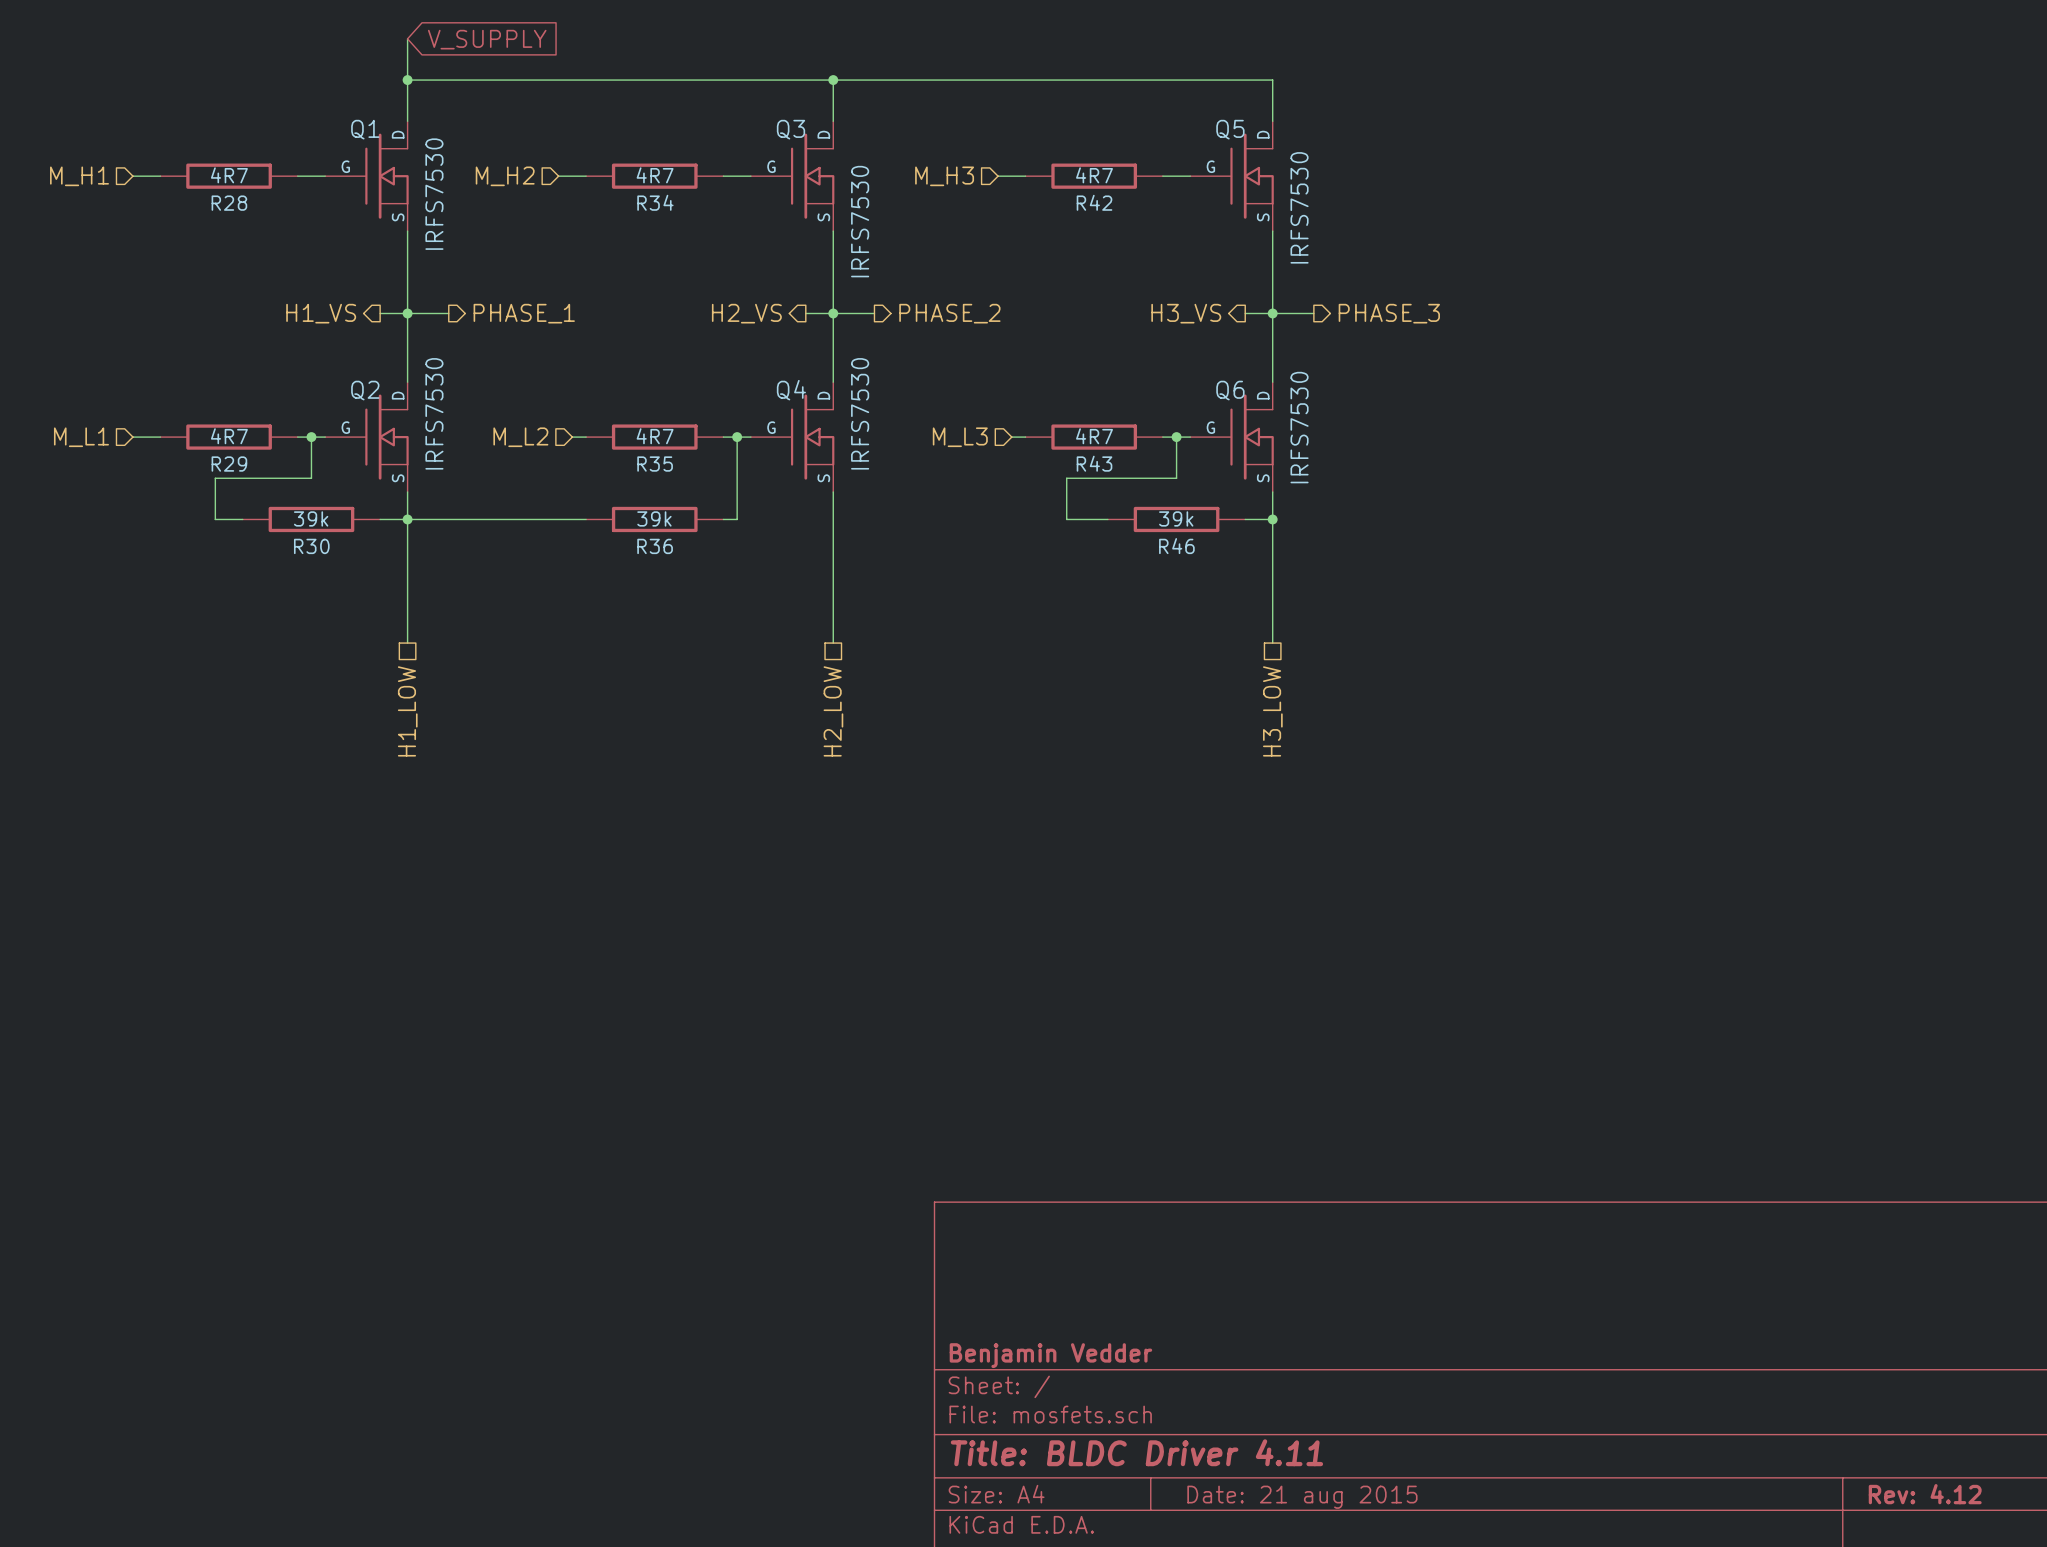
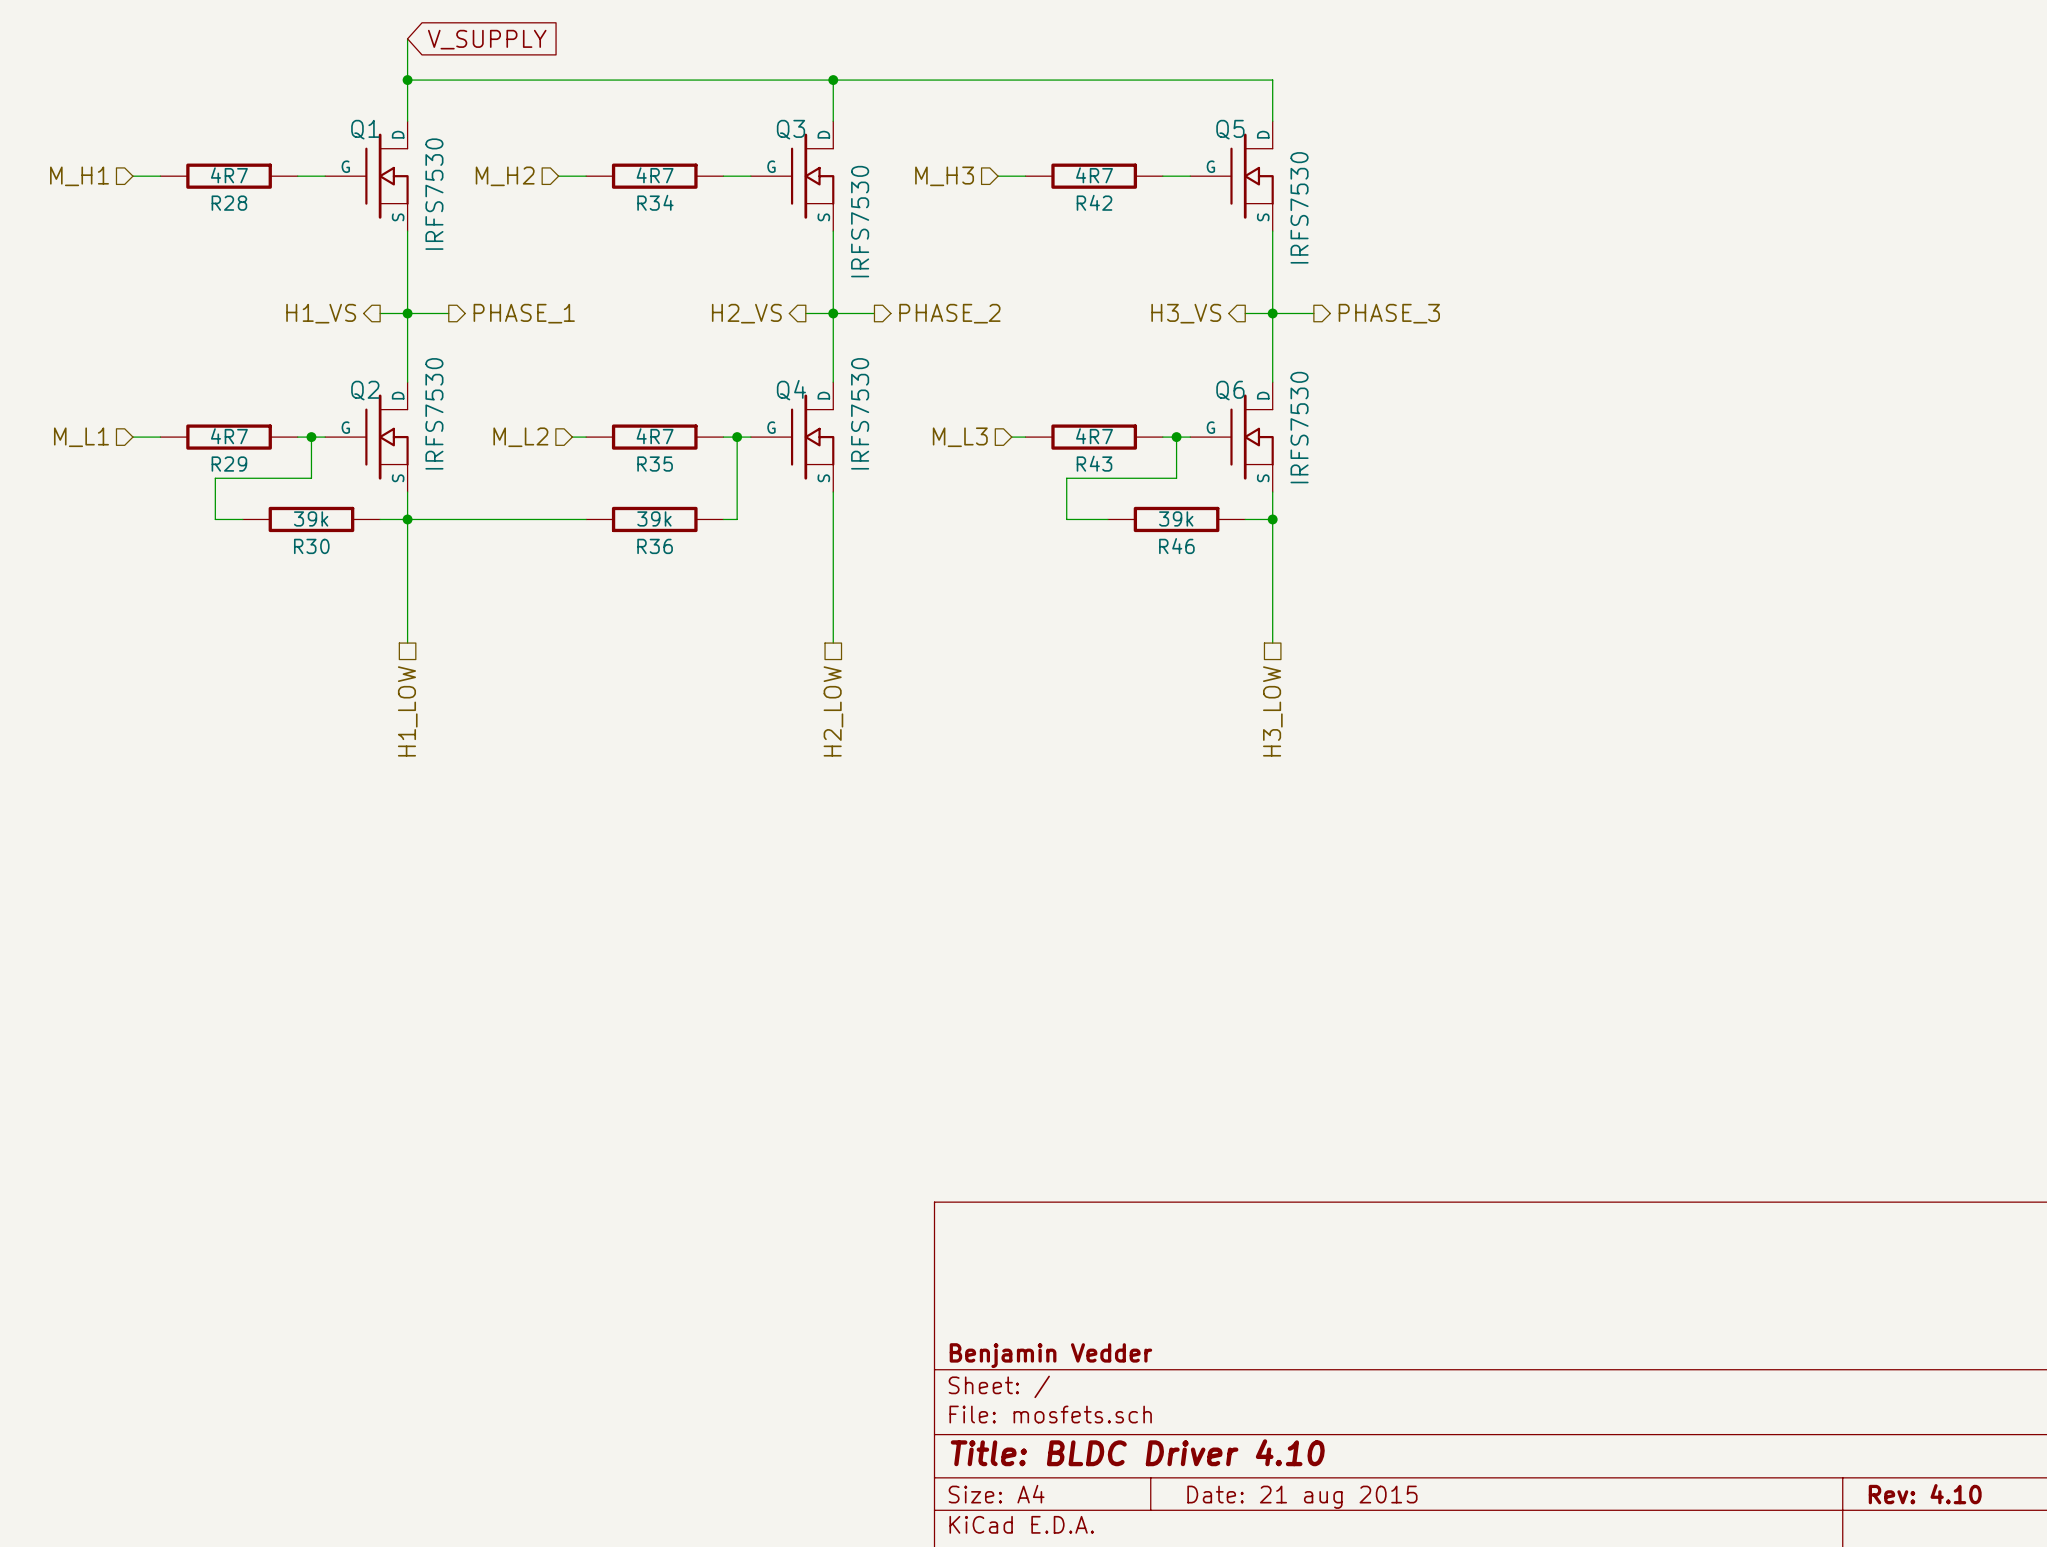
title block: Title: BLDC Driver 4.11 (1136, 1452) -> Title: BLDC Driver 4.10 (1137, 1452)
title block: Rev: 4.12 (1925, 1494) -> Rev: 4.10 (1925, 1494)

